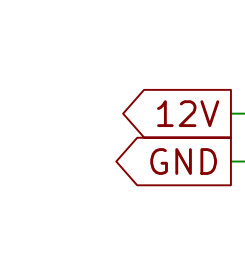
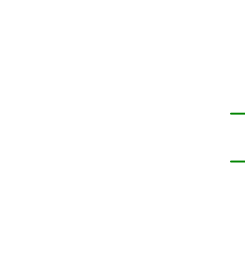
global label: 12V (188, 113) -> none
global label: GND (183, 161) -> none

